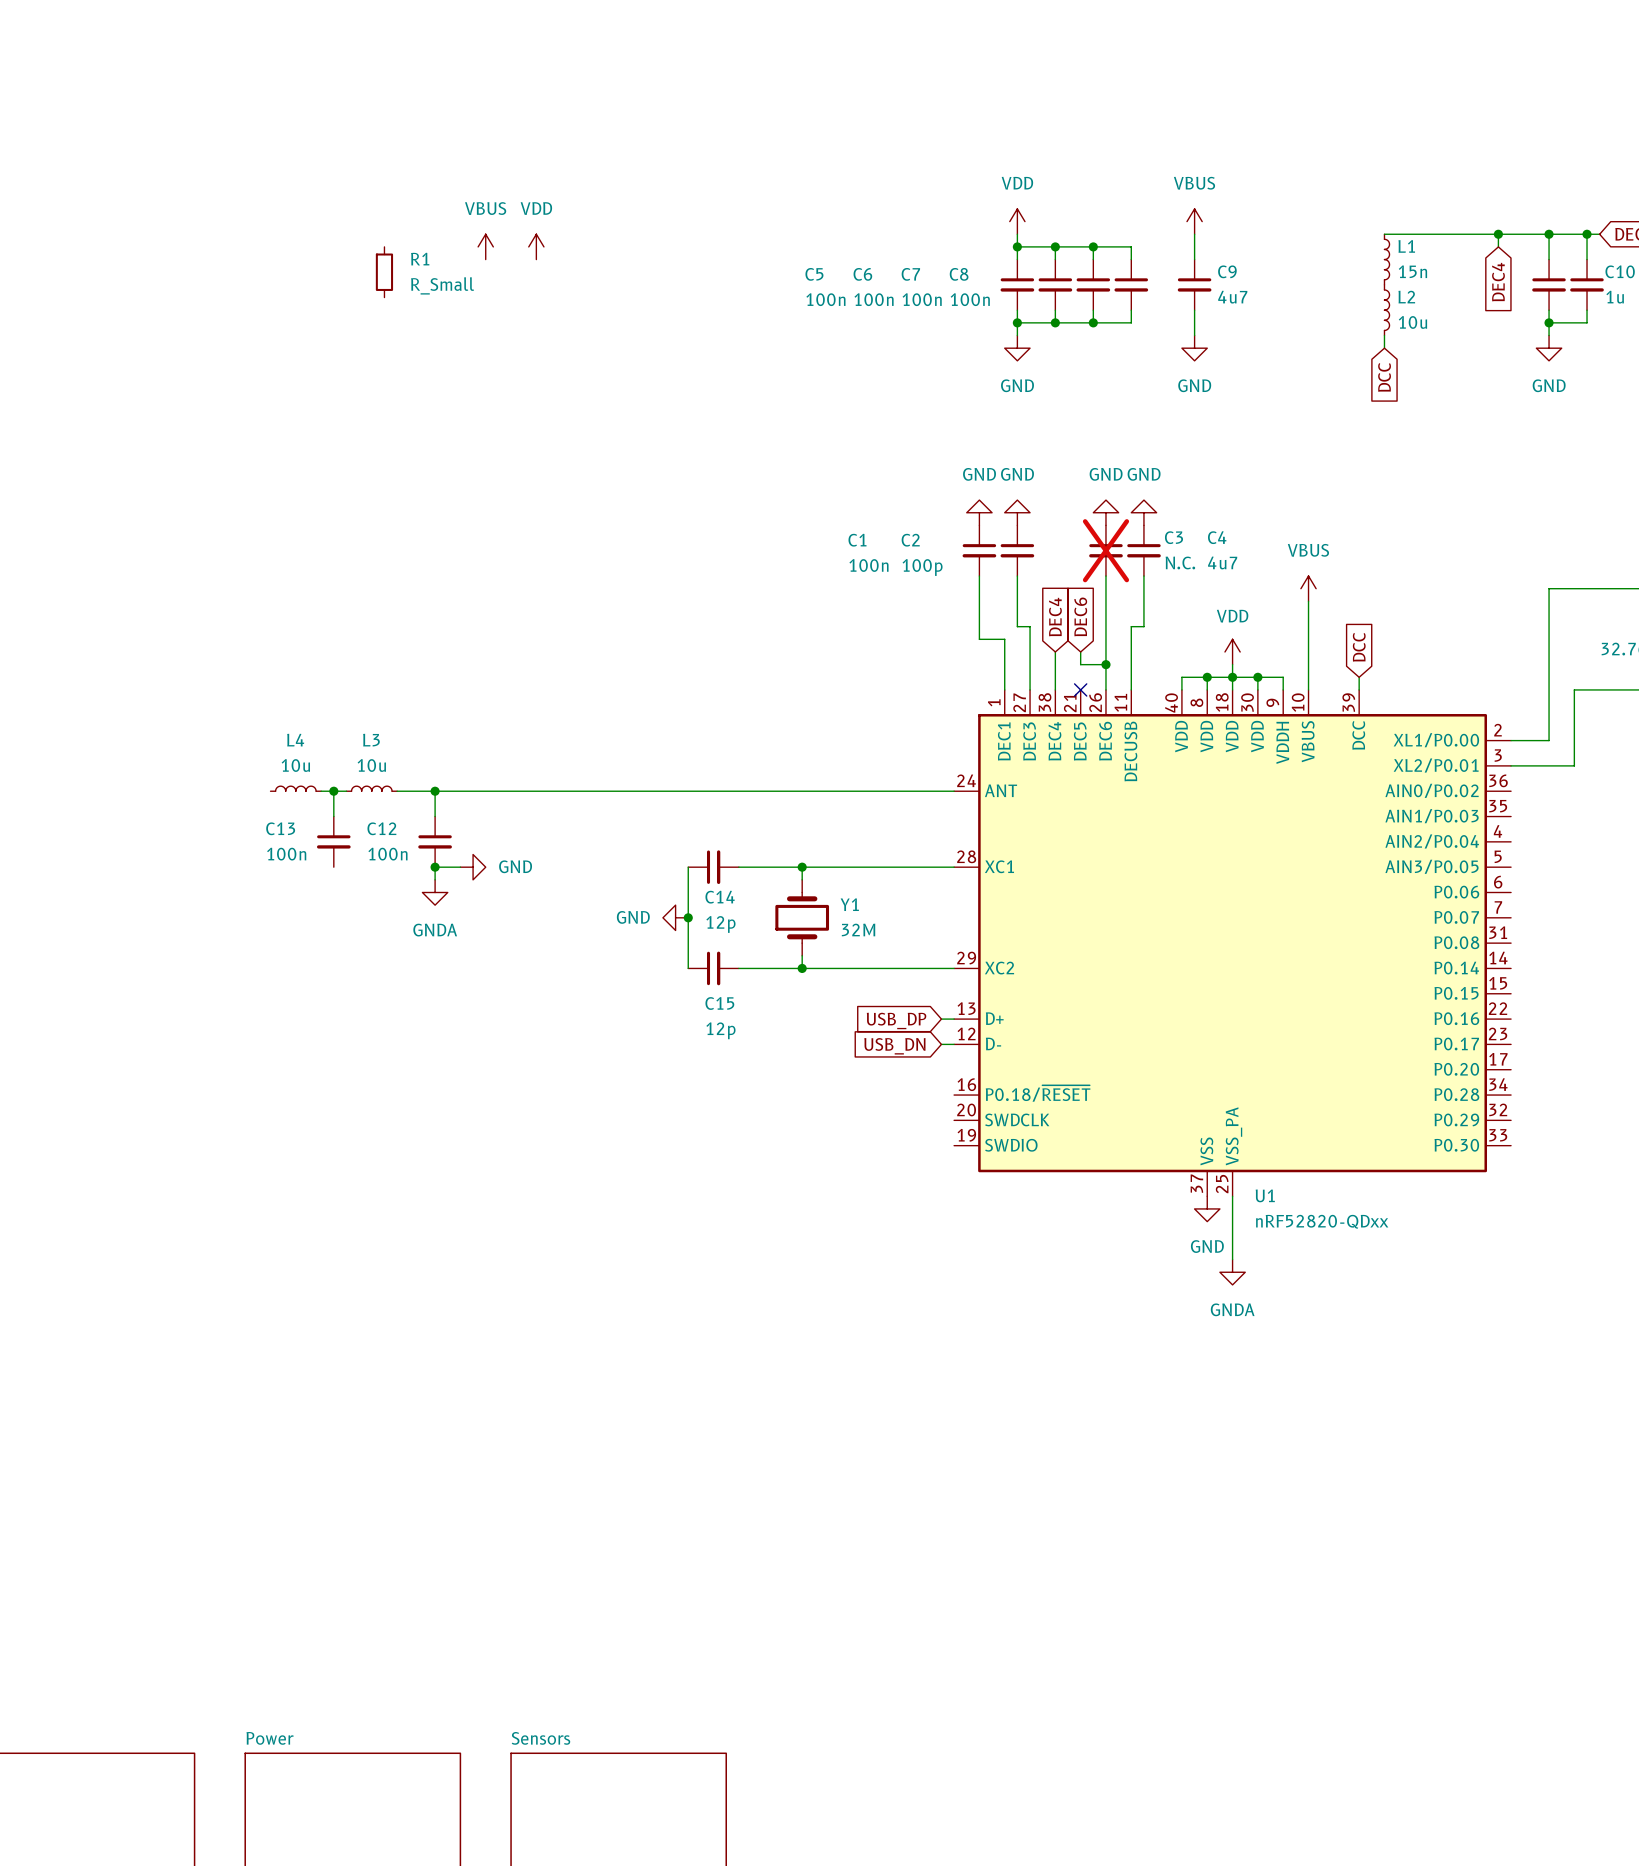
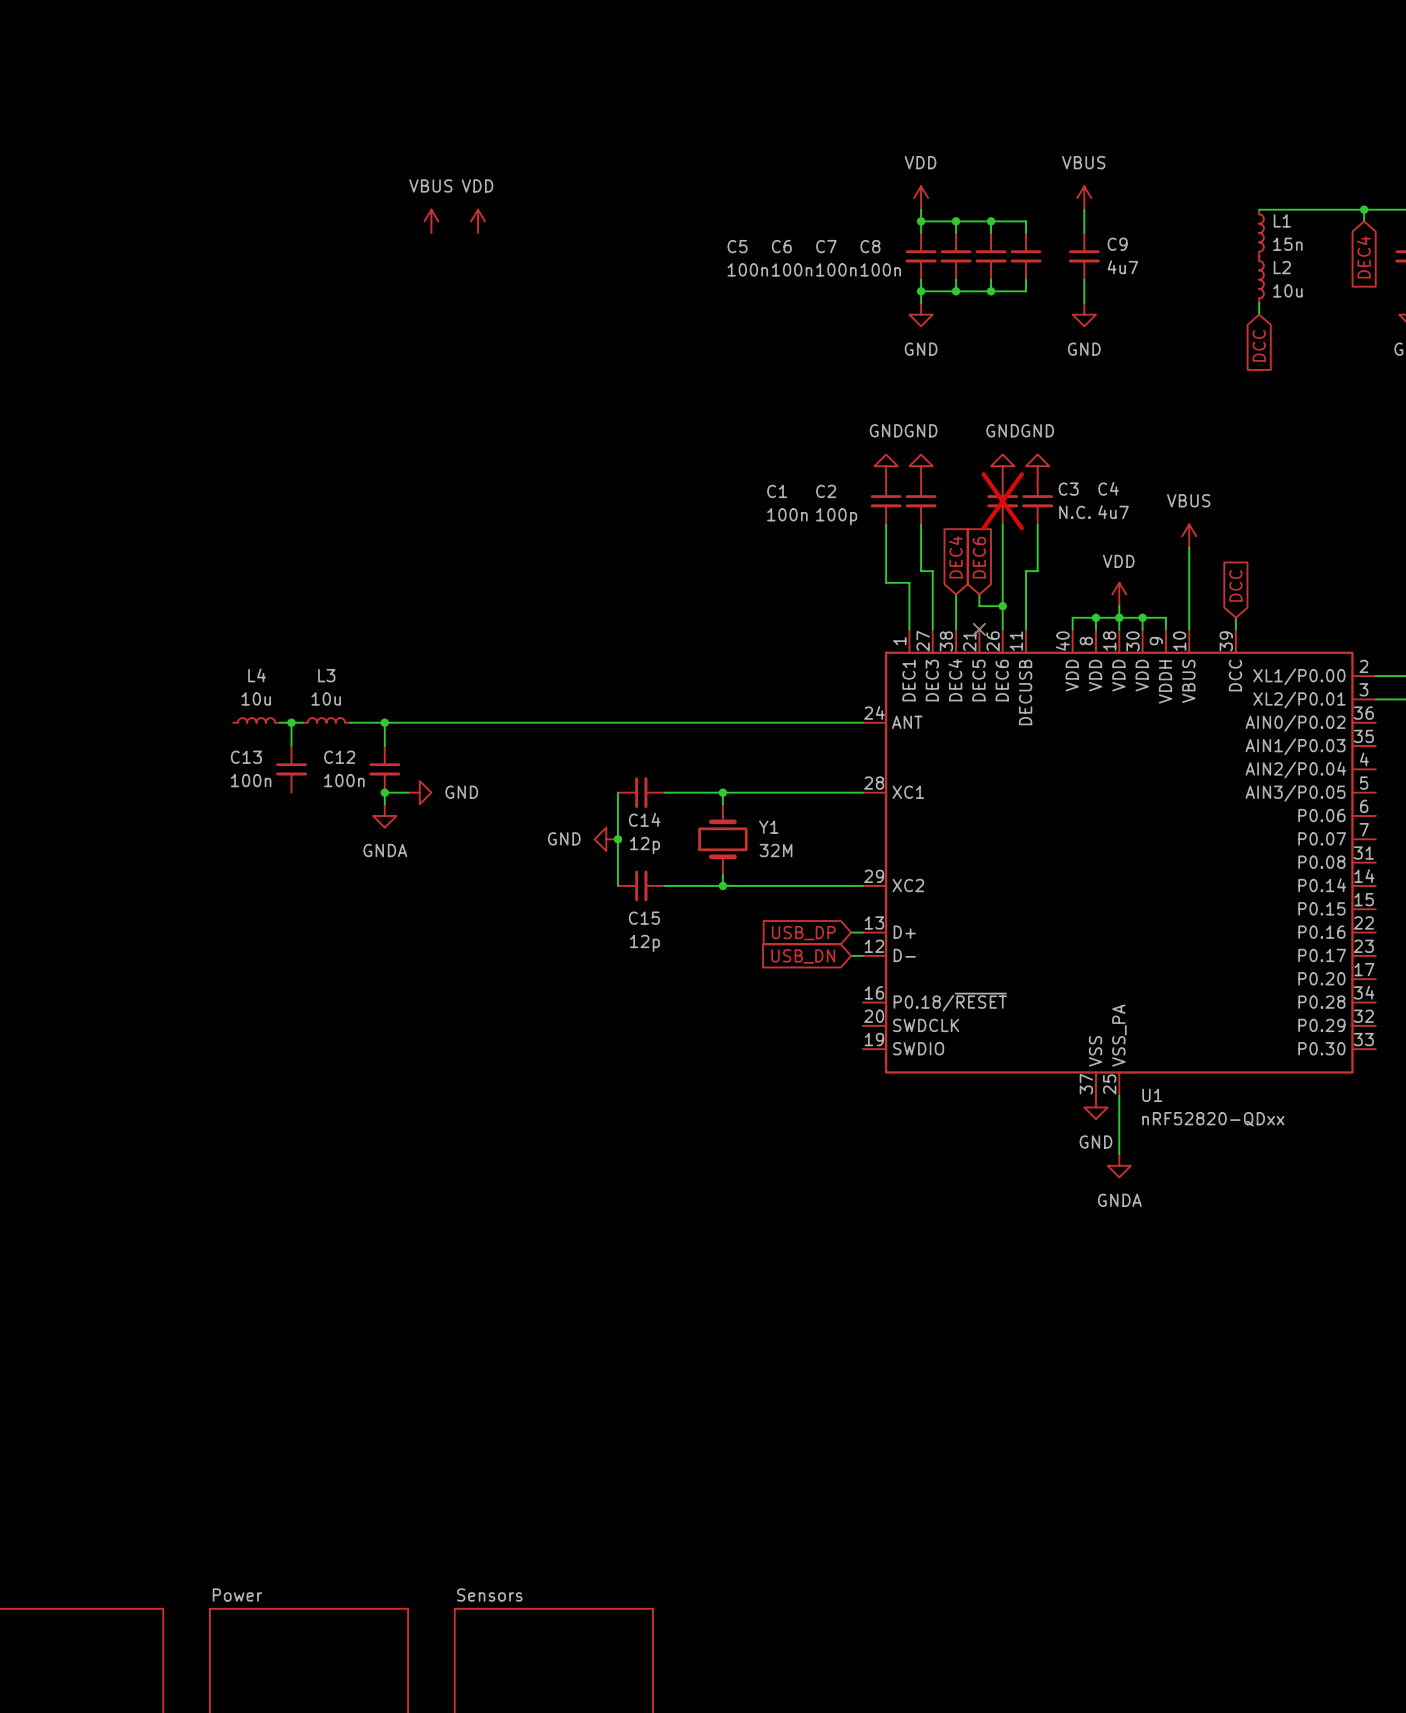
R1: R_Small (384, 272) -> none

